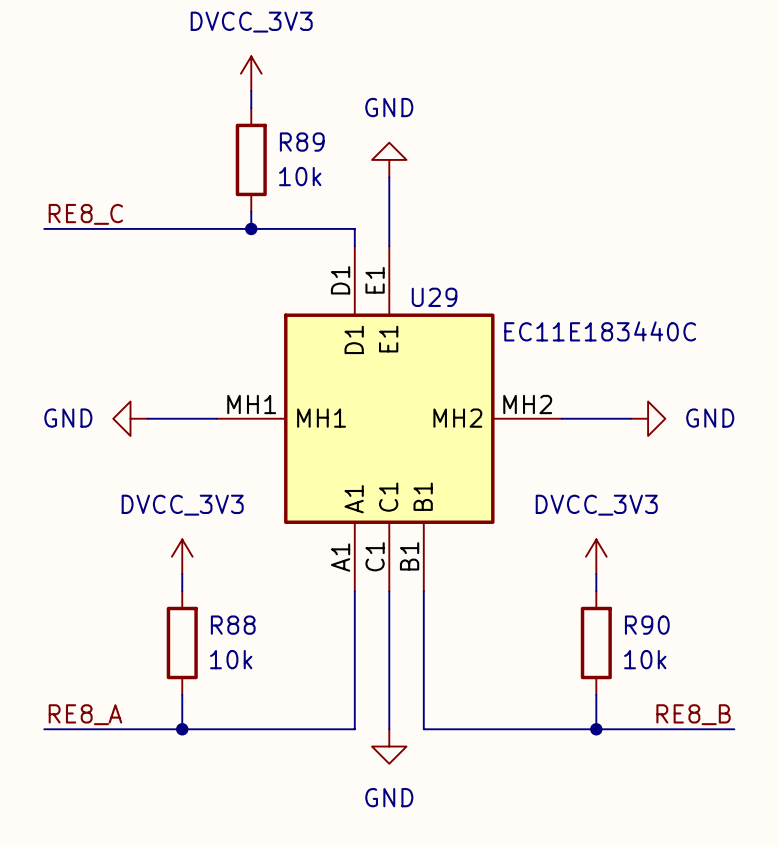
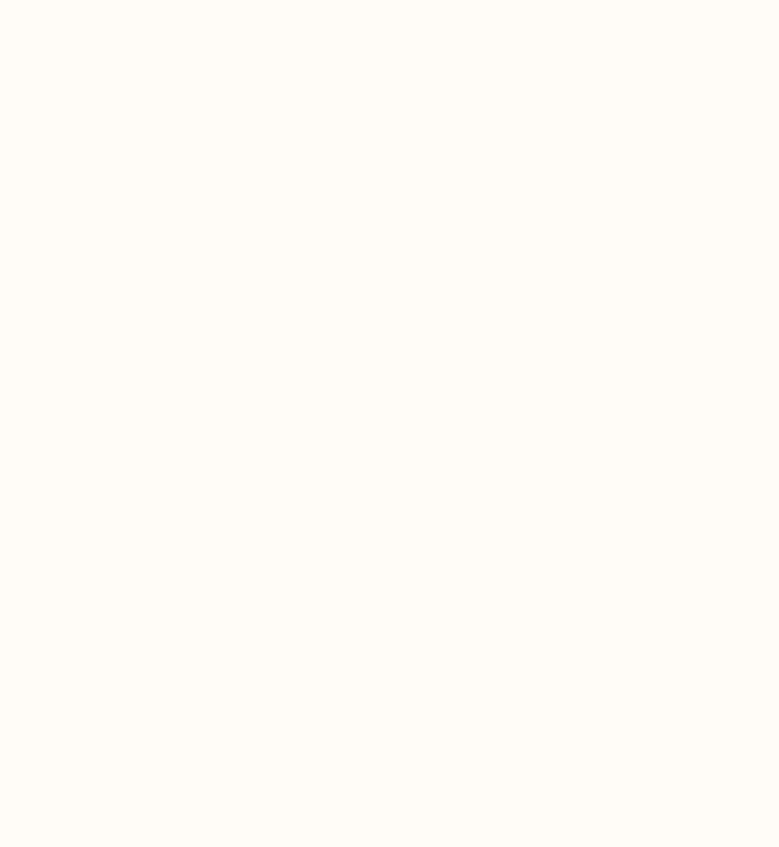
power symbol: DVCC_3V3 (251, 73) -> none
wire: (251, 90) (251, 108) -> none
R89: 10k (251, 159) -> none
power symbol: GND (389, 159) -> none
wire: (389, 177) (389, 246) -> none
wire: (251, 211) (251, 228) -> none
label: RE8_C (85, 214) -> none
wire: (44, 228) (354, 228) (354, 246) -> none
junction: (251, 228) -> none
power symbol: GND (130, 418) -> none
wire: (147, 418) (216, 418) -> none
U29: EC11E183440C (389, 418) -> none
wire: (561, 418) (630, 418) -> none
power symbol: GND (648, 418) -> none
power symbol: DVCC_3V3 (182, 556) -> none
power symbol: DVCC_3V3 (596, 556) -> none
wire: (182, 574) (182, 591) -> none
wire: (596, 574) (596, 591) -> none
wire: (354, 591) (354, 729) (44, 729) -> none
wire: (389, 591) (389, 729) -> none
wire: (423, 591) (423, 729) (734, 729) -> none
R88: 10k (182, 643) -> none
R90: 10k (596, 643) -> none
wire: (182, 694) (182, 729) -> none
wire: (596, 694) (596, 729) -> none
label: RE8_A (85, 714) -> none
label: RE8_B (693, 714) -> none
junction: (182, 729) -> none
junction: (596, 729) -> none
power symbol: GND (389, 746) -> none

